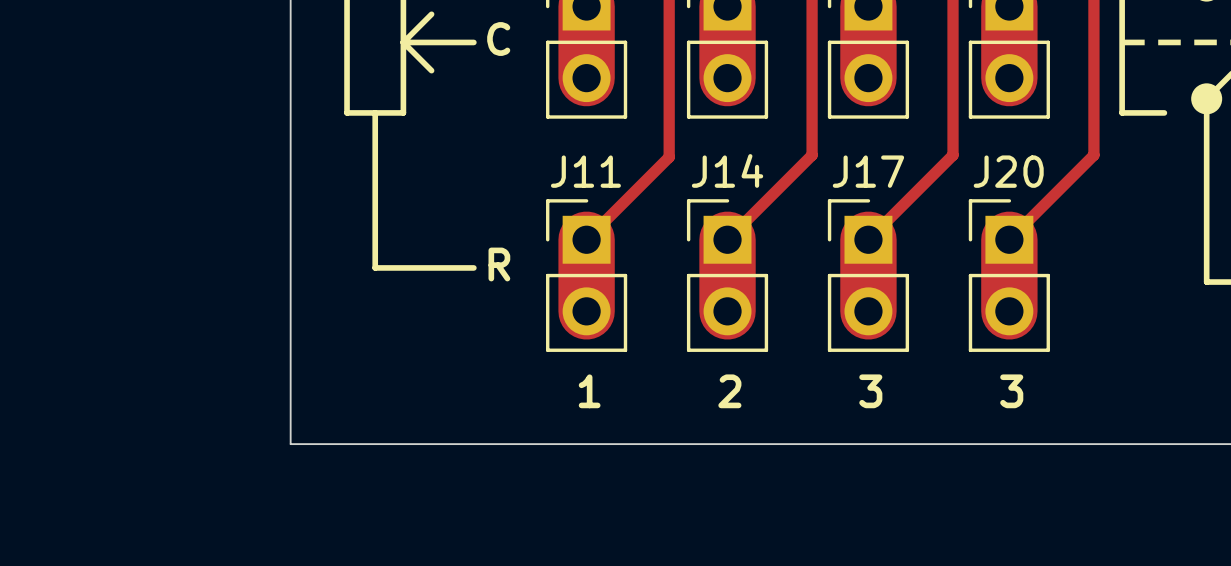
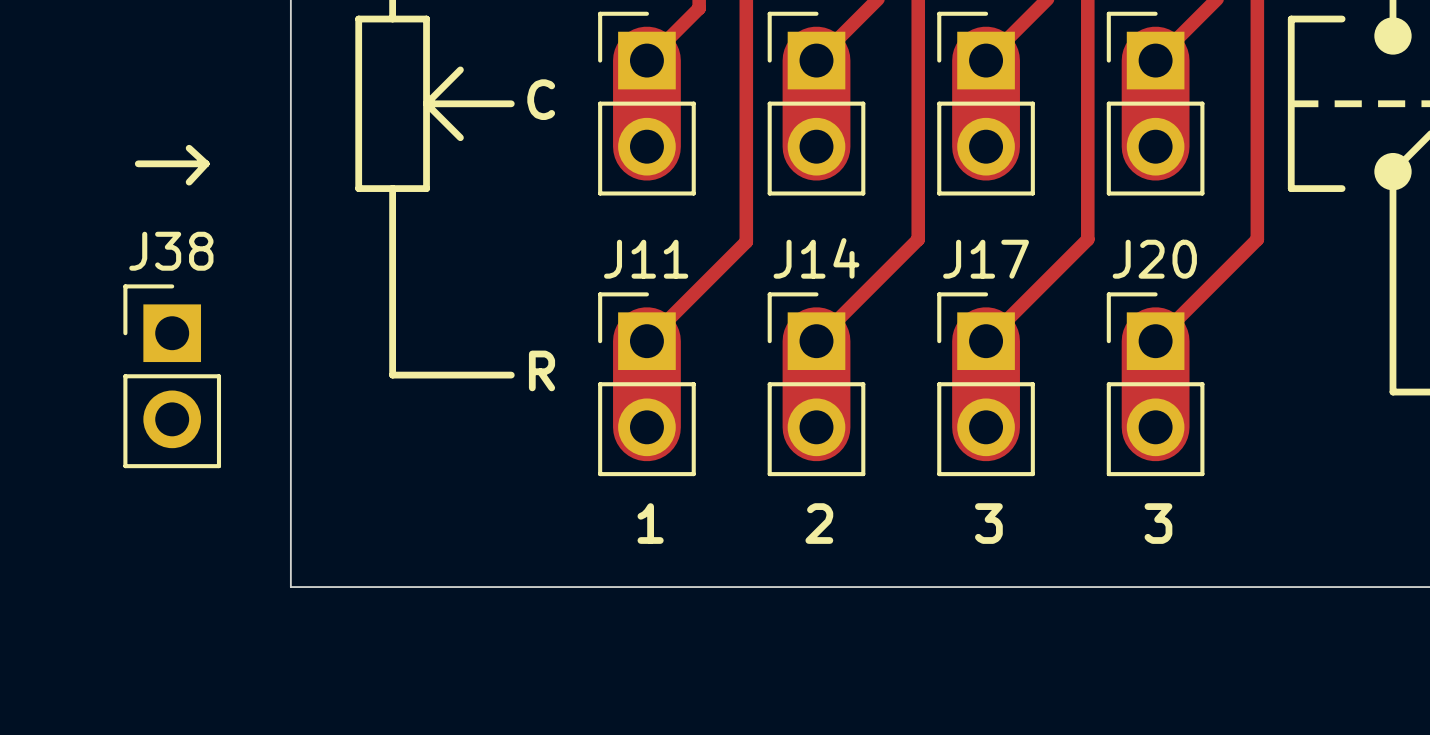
line: none -> (189, 148) (206, 163)
line: none -> (138, 163) (206, 163)
line: none -> (206, 163) (189, 182)
J38: none -> (172, 376)

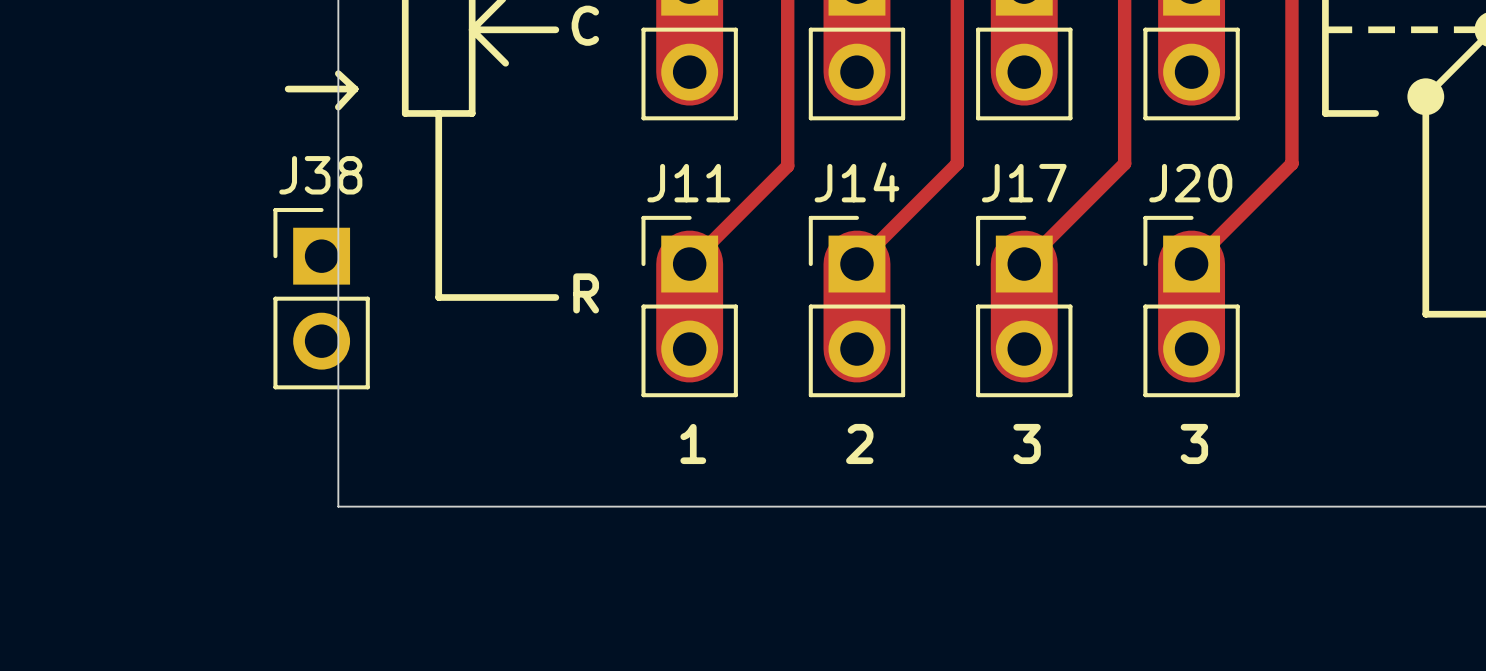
line: (189, 148) (206, 163) -> (338, 73) (355, 89)
line: (138, 163) (206, 163) -> (288, 89) (355, 89)
line: (206, 163) (189, 182) -> (355, 89) (338, 107)
J38 position: (172, 376) -> (321, 298)

